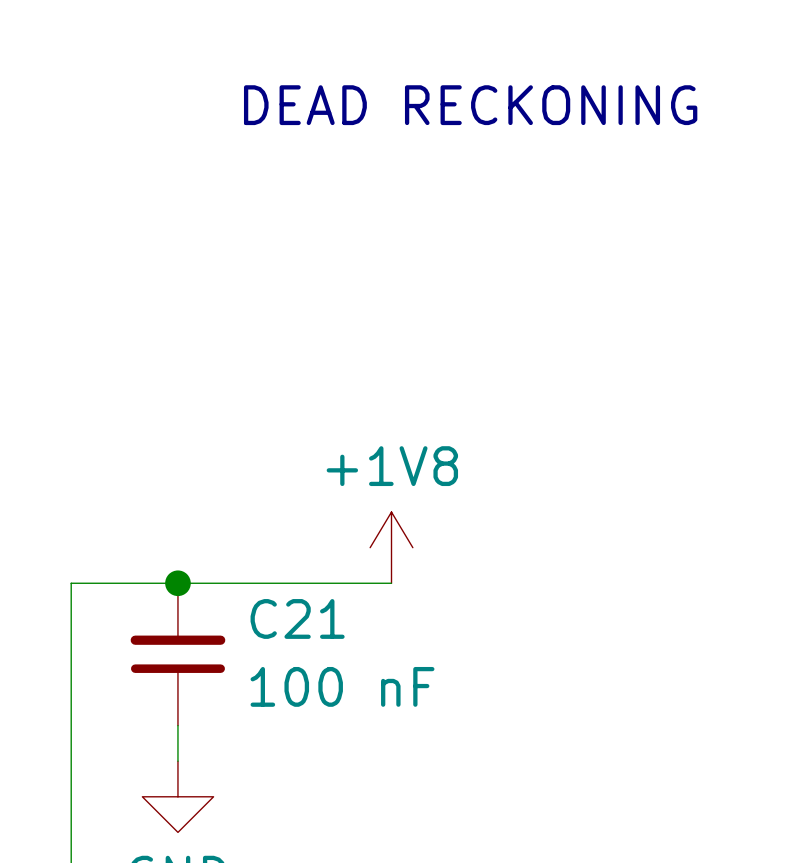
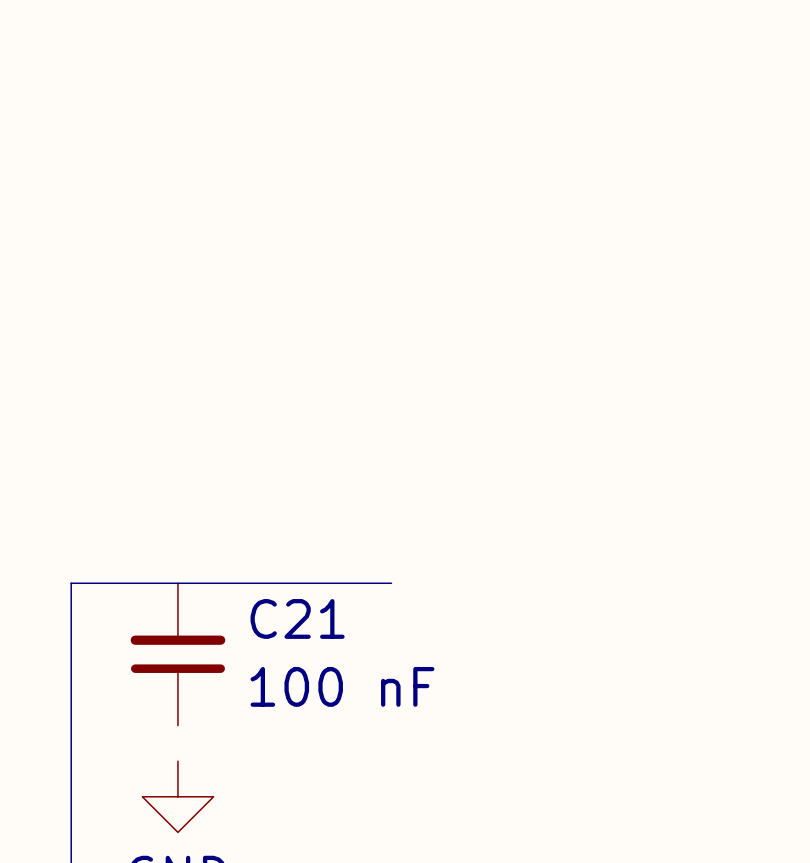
text: DEAD RECKONING (470, 105) -> none
power symbol: +1V8 (391, 547) -> none
junction: (177, 583) -> none
wire: (177, 725) (177, 761) -> none

